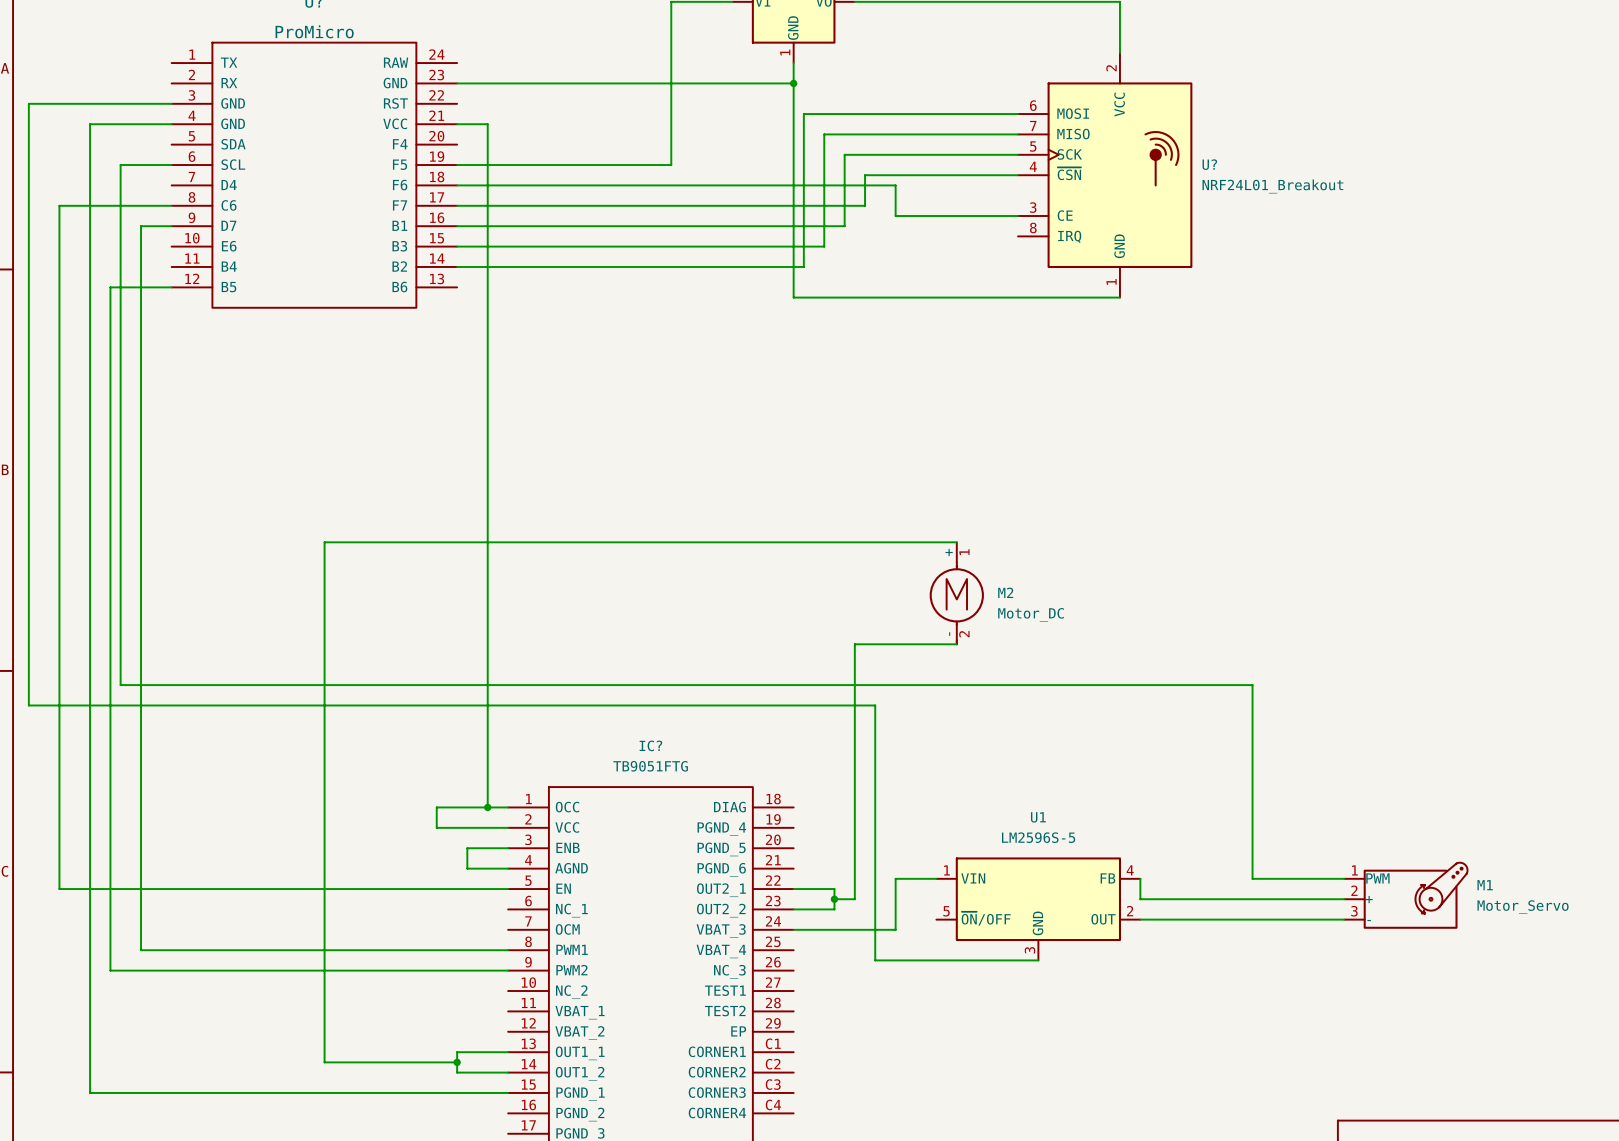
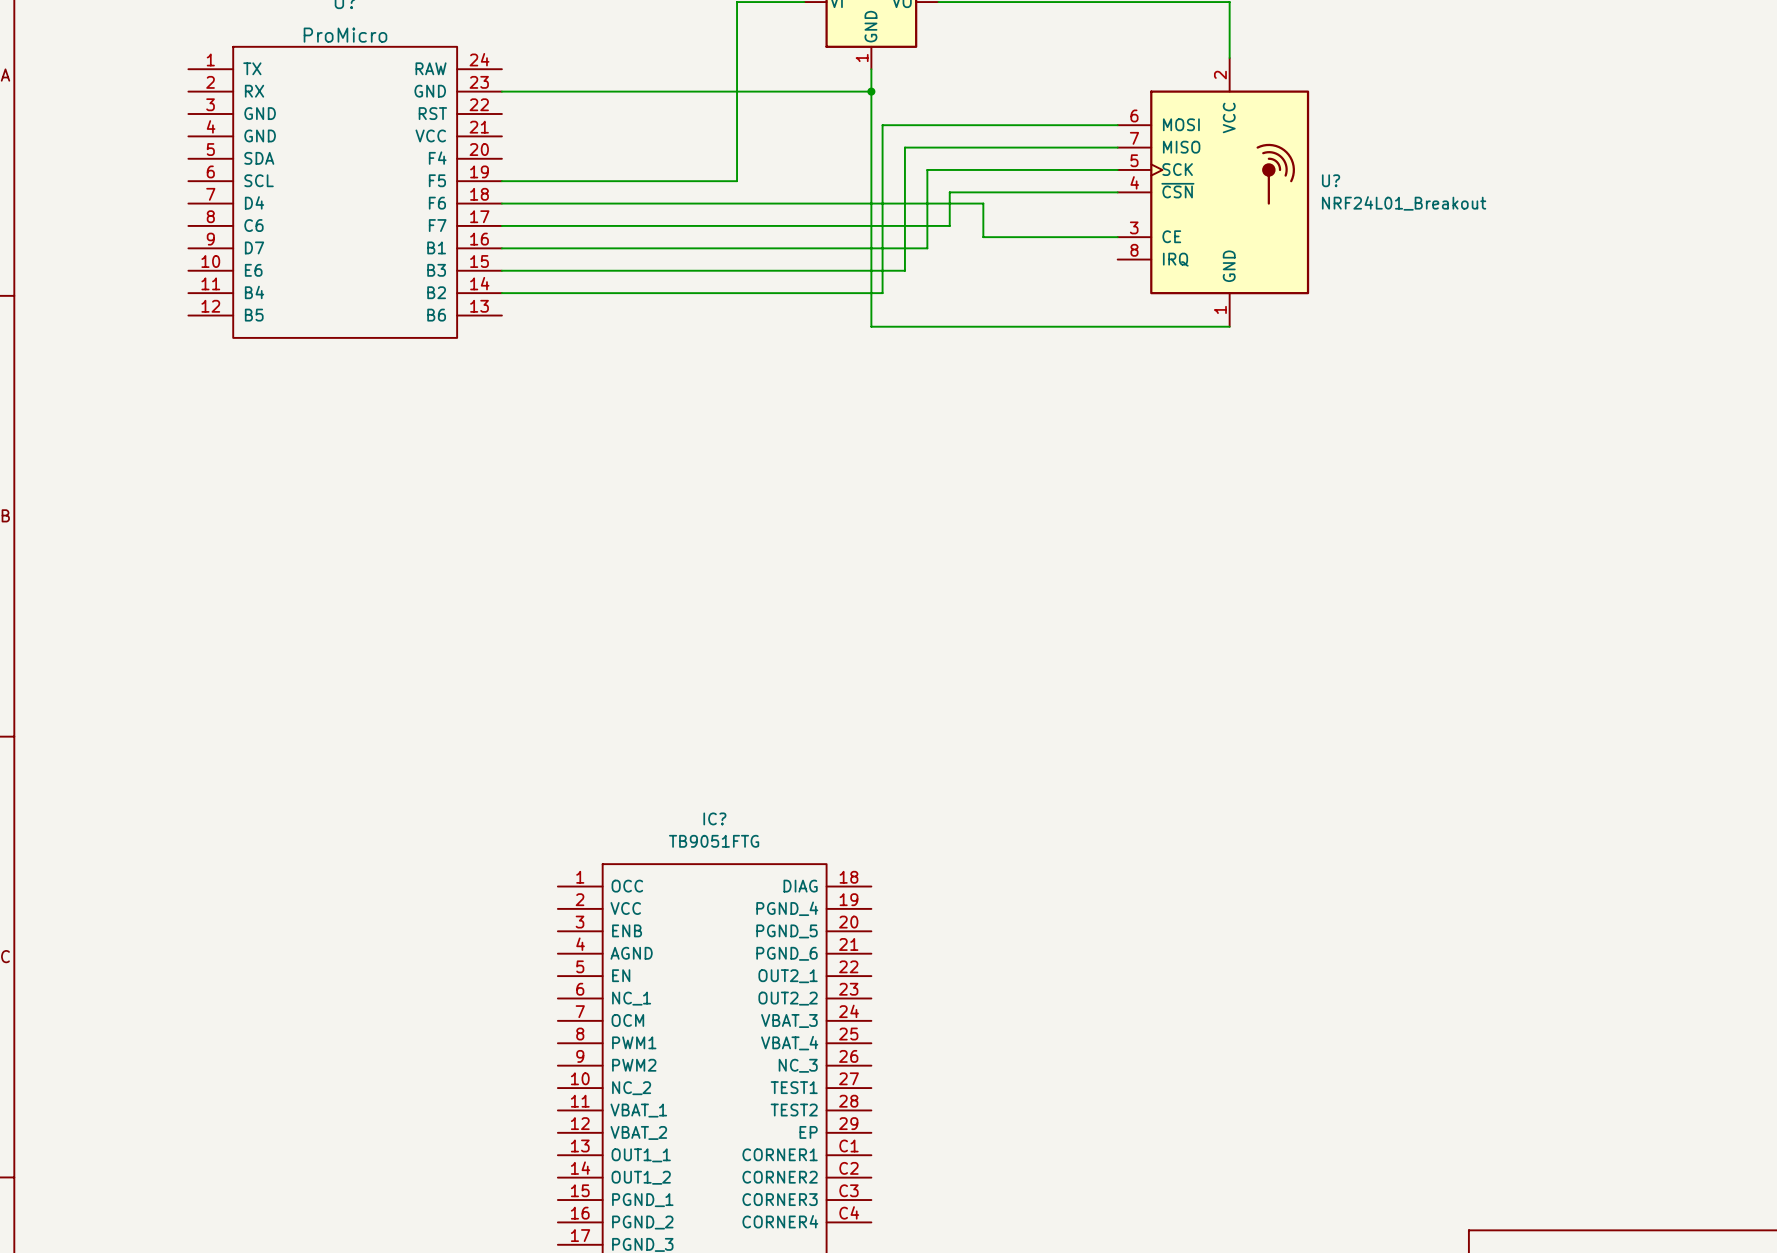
wire: (171, 103) (28, 103) (28, 705) (875, 705) (875, 960) (1038, 960) -> none
wire: (171, 124) (90, 124) (90, 1092) (508, 1092) -> none
wire: (457, 124) (487, 124) (487, 807) -> none
wire: (171, 165) (120, 165) (120, 685) (1252, 685) (1252, 878) (1344, 878) -> none
wire: (171, 205) (59, 205) (59, 889) (508, 889) -> none
wire: (171, 226) (141, 226) (141, 950) (508, 950) -> none
wire: (171, 287) (110, 287) (110, 970) (508, 970) -> none
wire: (956, 542) (324, 542) (324, 1062) (457, 1062) -> none
M2: Motor_DC (956, 593) -> none
wire: (956, 644) (854, 644) (854, 899) (834, 899) -> none
junction: (487, 807) -> none
wire: (508, 807) (436, 807) (436, 827) (508, 827) -> none
wire: (508, 848) (467, 848) (467, 868) (508, 868) -> none
wire: (936, 878) (895, 878) (895, 929) (793, 929) -> none
wire: (1140, 878) (1140, 899) (1344, 899) -> none
wire: (793, 889) (834, 889) (834, 909) (793, 909) -> none
M1: Motor_Servo (1405, 895) -> none
junction: (834, 899) -> none
U1: LM2596S-5 (1038, 908) -> none
wire: (1140, 919) (1344, 919) -> none
wire: (508, 1052) (457, 1052) (457, 1072) (508, 1072) -> none
junction: (457, 1062) -> none

